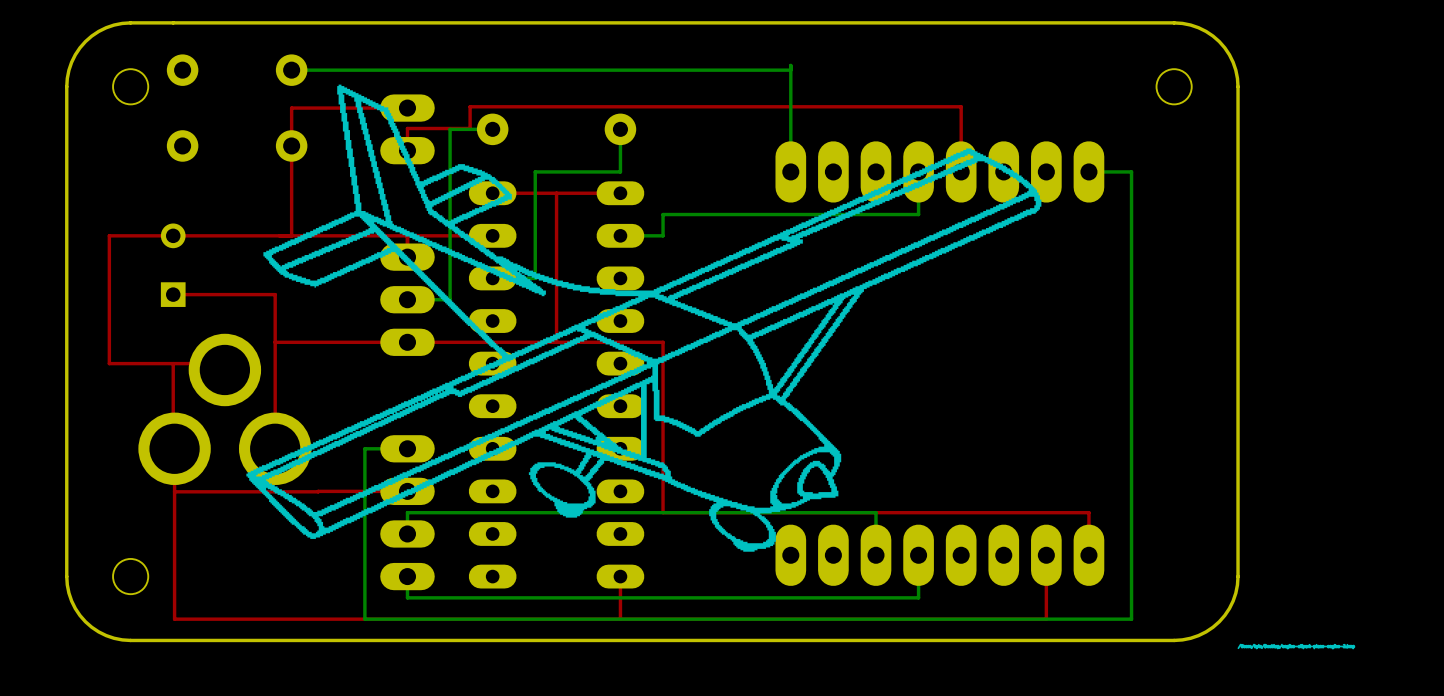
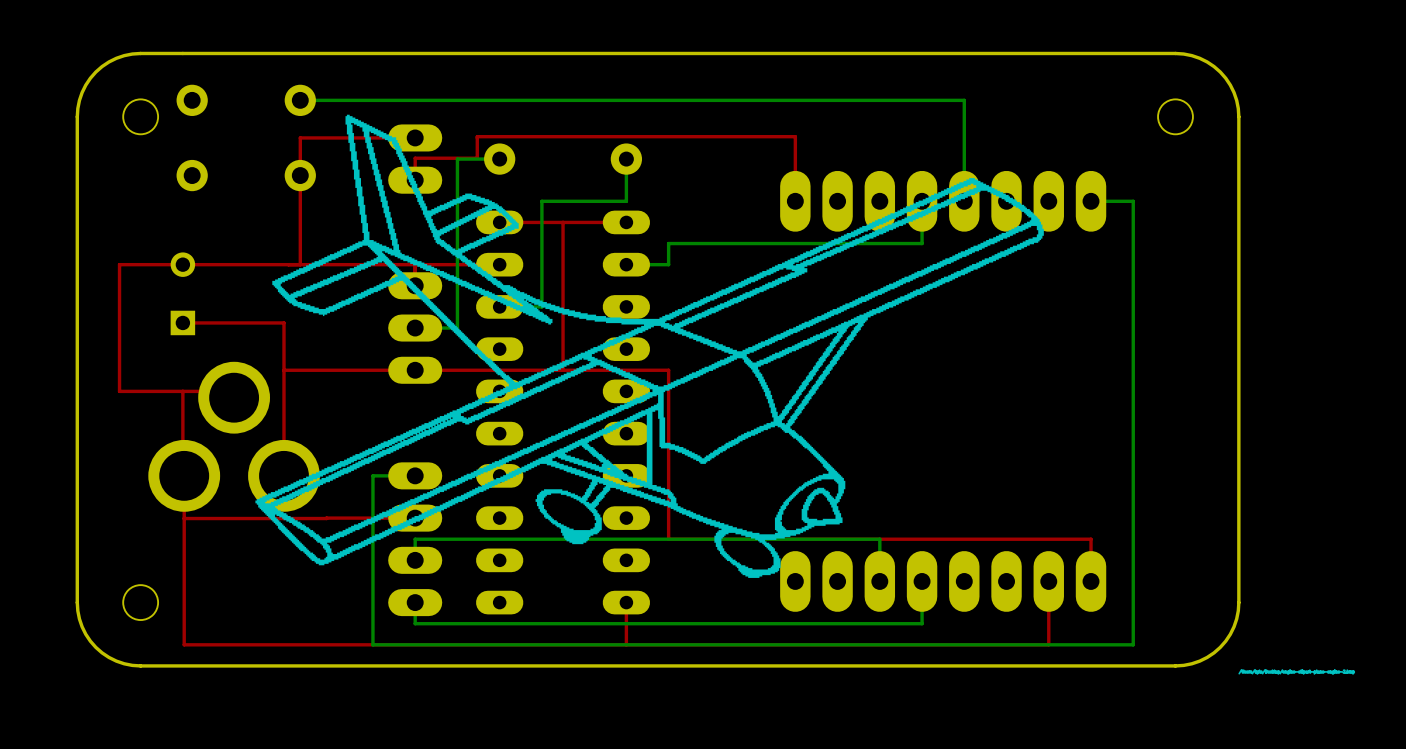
bottom track: (790, 65) (790, 171) -> none
bottom track: none -> (795, 100) (964, 100) (964, 201)
top track: (790, 106) (961, 106) (961, 171) -> (795, 136) (795, 201)

